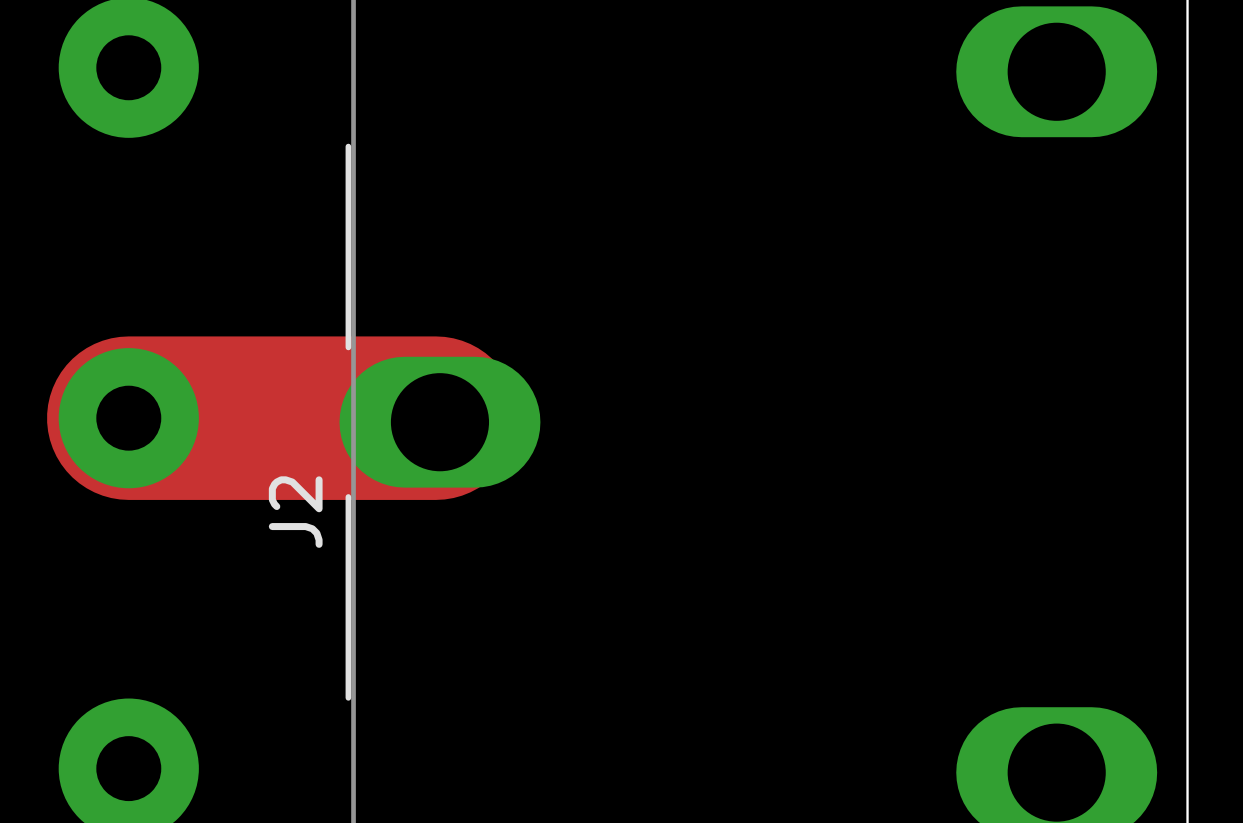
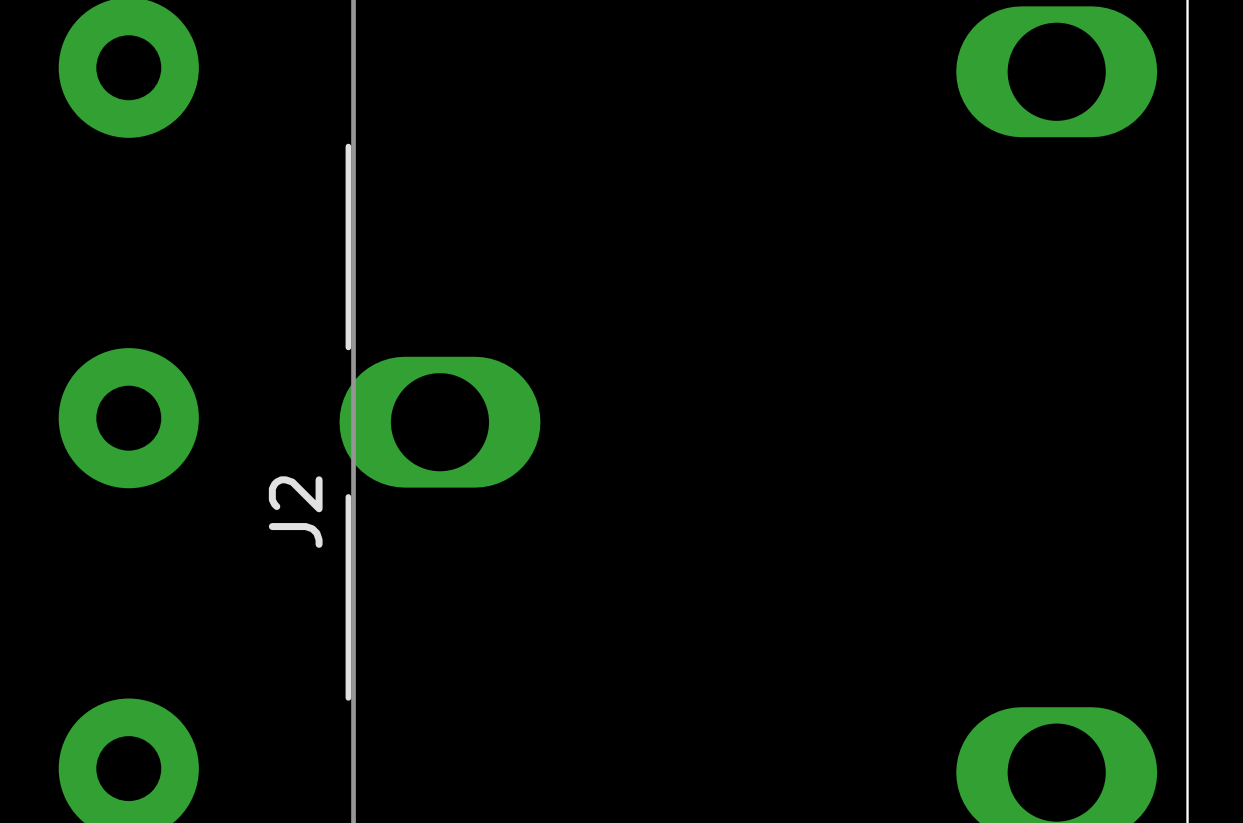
track: (128, 418) (435, 418) (439, 422) -> none

